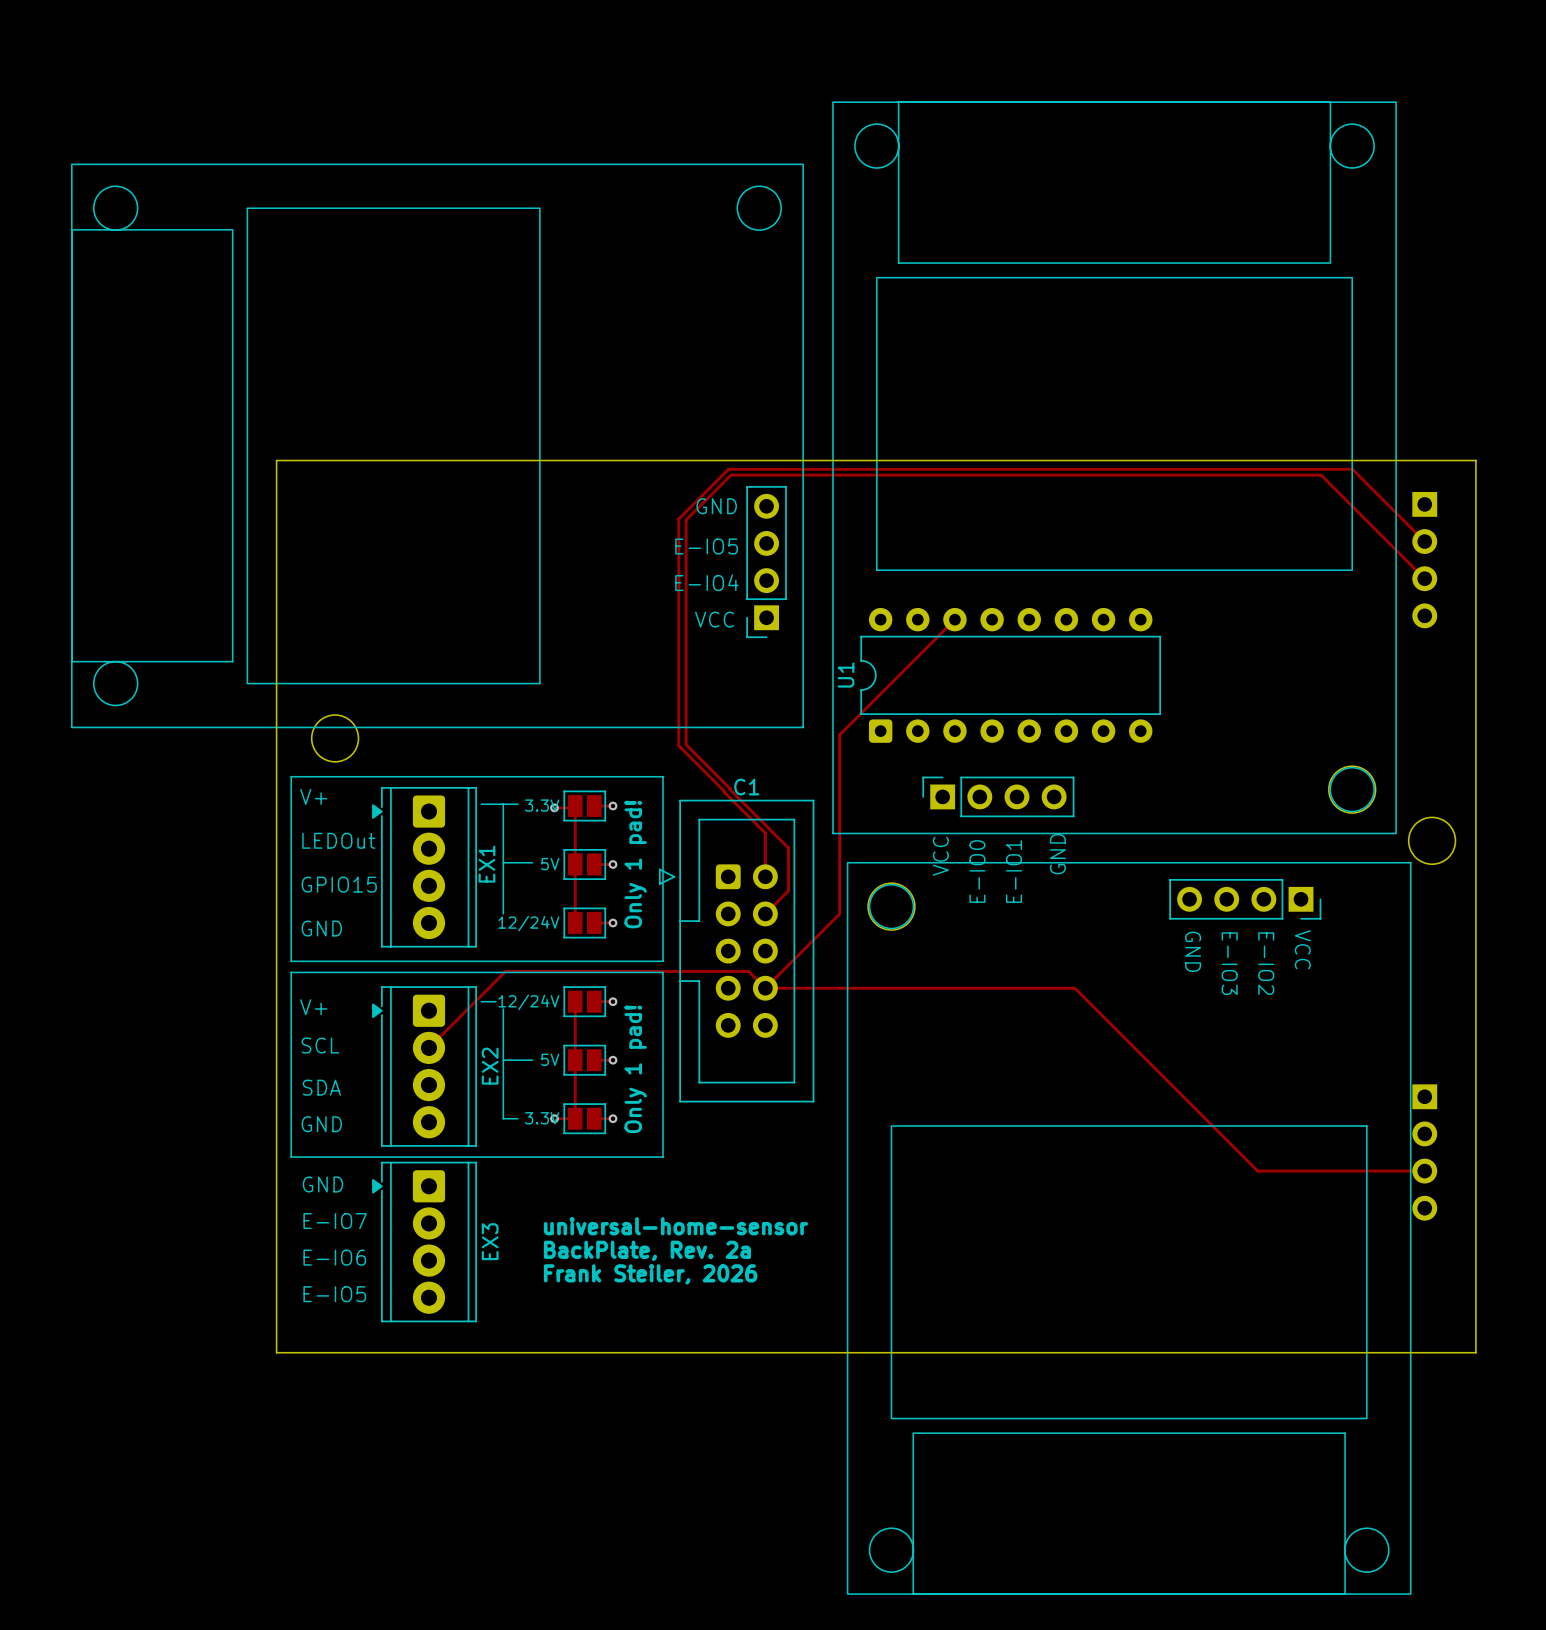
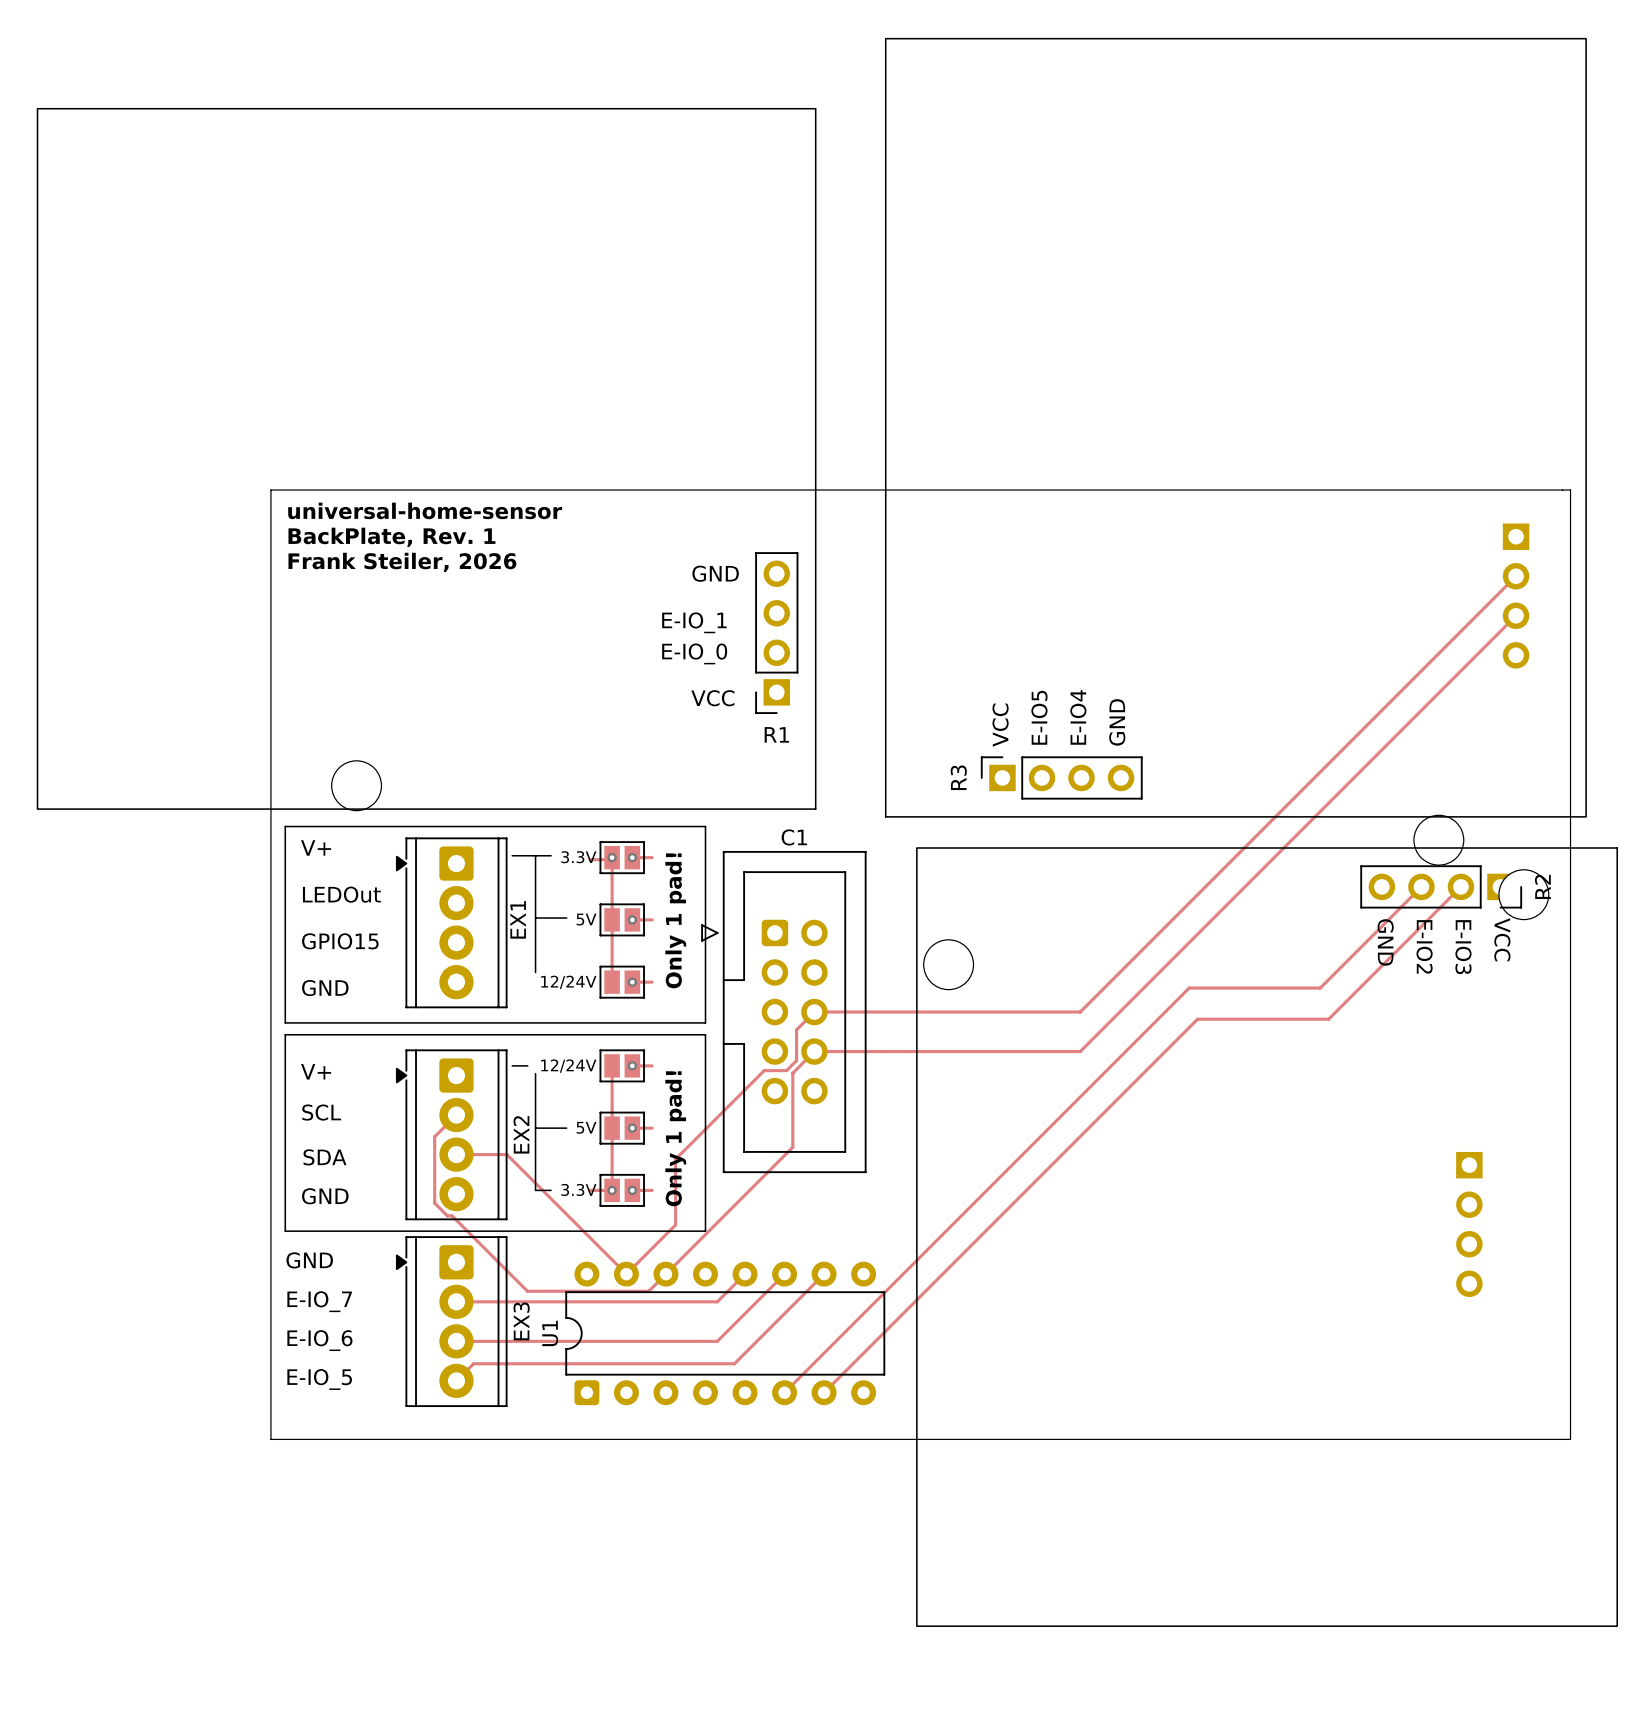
R3: none -> (1235, 427)
R1: none -> (426, 458)
part: (437, 445) -> none
board edge: (276, 460) (276, 1352) -> (294, 490) (270, 490) (270, 1439) (294, 1439)
part: (1114, 467) -> none
text: none -> universal-home-sensor (425, 510)
text: none -> BackPlate, Rev. 1 (391, 537)
text: none -> Frank Steiler, 2026 (402, 562)
track: (1424, 541) (1352, 469) (728, 469) (678, 519) (678, 745) (765, 833) (765, 876) -> (1516, 576) (1080, 1012) (814, 1012) (796, 1029) (796, 1060) (786, 1070) (764, 1070) (675, 1159) (675, 1224) (626, 1274) (506, 1154) (456, 1154)
track: (1424, 578) (1321, 475) (730, 475) (686, 519) (686, 744) (788, 848) (788, 890) (765, 913) -> (1516, 615) (1080, 1051)
track: (954, 619) (839, 734) (839, 913) (765, 988) (748, 971) (505, 971) (428, 1047) -> (814, 1051) (792, 1073) (792, 1147) (648, 1291) (527, 1291) (452, 1215) (447, 1215) (434, 1203) (434, 1136) (456, 1115)
U1 position: (1010, 675) -> (725, 1333)
line: (291, 776) (291, 961) -> (309, 826) (285, 826) (285, 1022) (309, 1022)
text position: V+ (313, 796) -> V+ (316, 847)
via: none -> (612, 857)
via: none -> (632, 857)
via: (612, 805) -> none
via: (554, 807) -> none
track: none -> (1421, 886) (1320, 988) (1189, 988) (784, 1392)
track: none -> (1460, 886) (1328, 1019) (1197, 1019) (824, 1392)
text position: LEDOut (338, 840) -> LEDOut (341, 894)
via: none -> (632, 919)
via: (612, 864) -> none
text position: GPIO15 (339, 884) -> GPIO15 (340, 941)
via: none -> (632, 982)
via: (612, 923) -> none
text position: GND (321, 928) -> GND (325, 988)
line: (291, 972) (291, 1157) -> (309, 1034) (285, 1034) (285, 1231) (309, 1231)
track: (1015, 988) (1074, 988) (1257, 1171) (1424, 1171) -> none
via: none -> (632, 1065)
via: (612, 1001) -> none
text position: V+ (313, 1007) -> V+ (316, 1071)
text position: SCL (320, 1045) -> SCL (321, 1112)
via: none -> (632, 1128)
via: (612, 1060) -> none
text position: SDA (321, 1087) -> SDA (325, 1157)
via: (554, 1118) -> none
via: none -> (612, 1190)
via: none -> (632, 1190)
via: (612, 1118) -> none
text position: GND (321, 1124) -> GND (325, 1196)
part position: (1424, 1152) -> (1469, 1224)
R2: none -> (1267, 1237)
text position: GND (322, 1184) -> GND (309, 1260)
track: none -> (745, 1274) (717, 1301) (456, 1301)
track: none -> (784, 1274) (717, 1341) (456, 1341)
track: none -> (824, 1274) (734, 1363) (473, 1363) (456, 1380)
text: E-IO7 (335, 1221) -> E-IO_7 (319, 1301)
text: universal-home-sensor (675, 1226) -> none
part: (1129, 1228) -> none
text: BackPlate, Rev. 2a (647, 1250) -> none
text: E-IO6 (334, 1257) -> E-IO_6 (319, 1340)
text: Frank Steiler, 2026 (650, 1274) -> none
text: E-IO5 (334, 1294) -> E-IO_5 (319, 1379)

